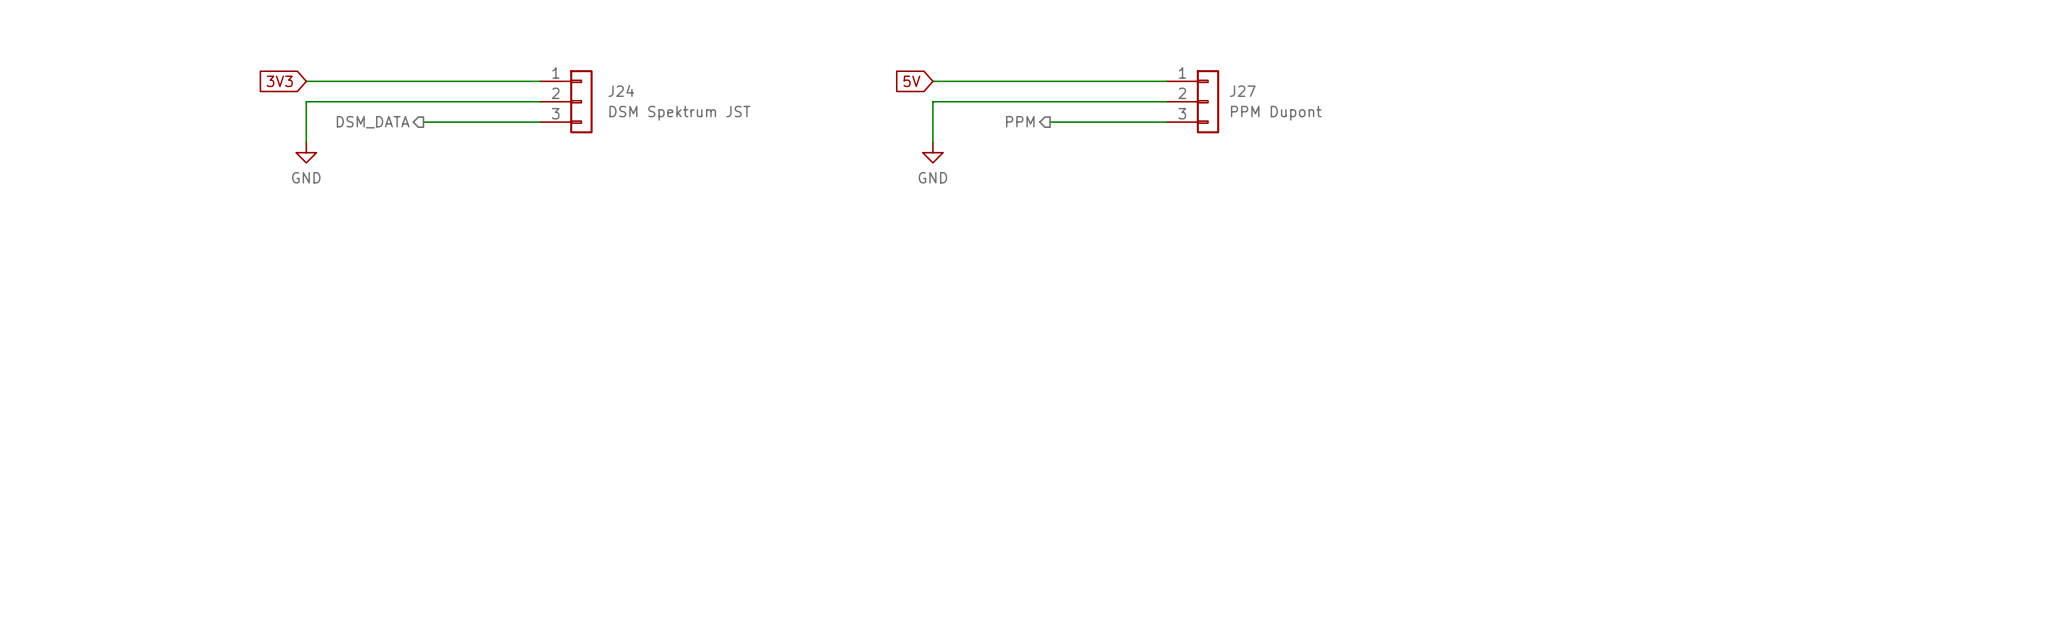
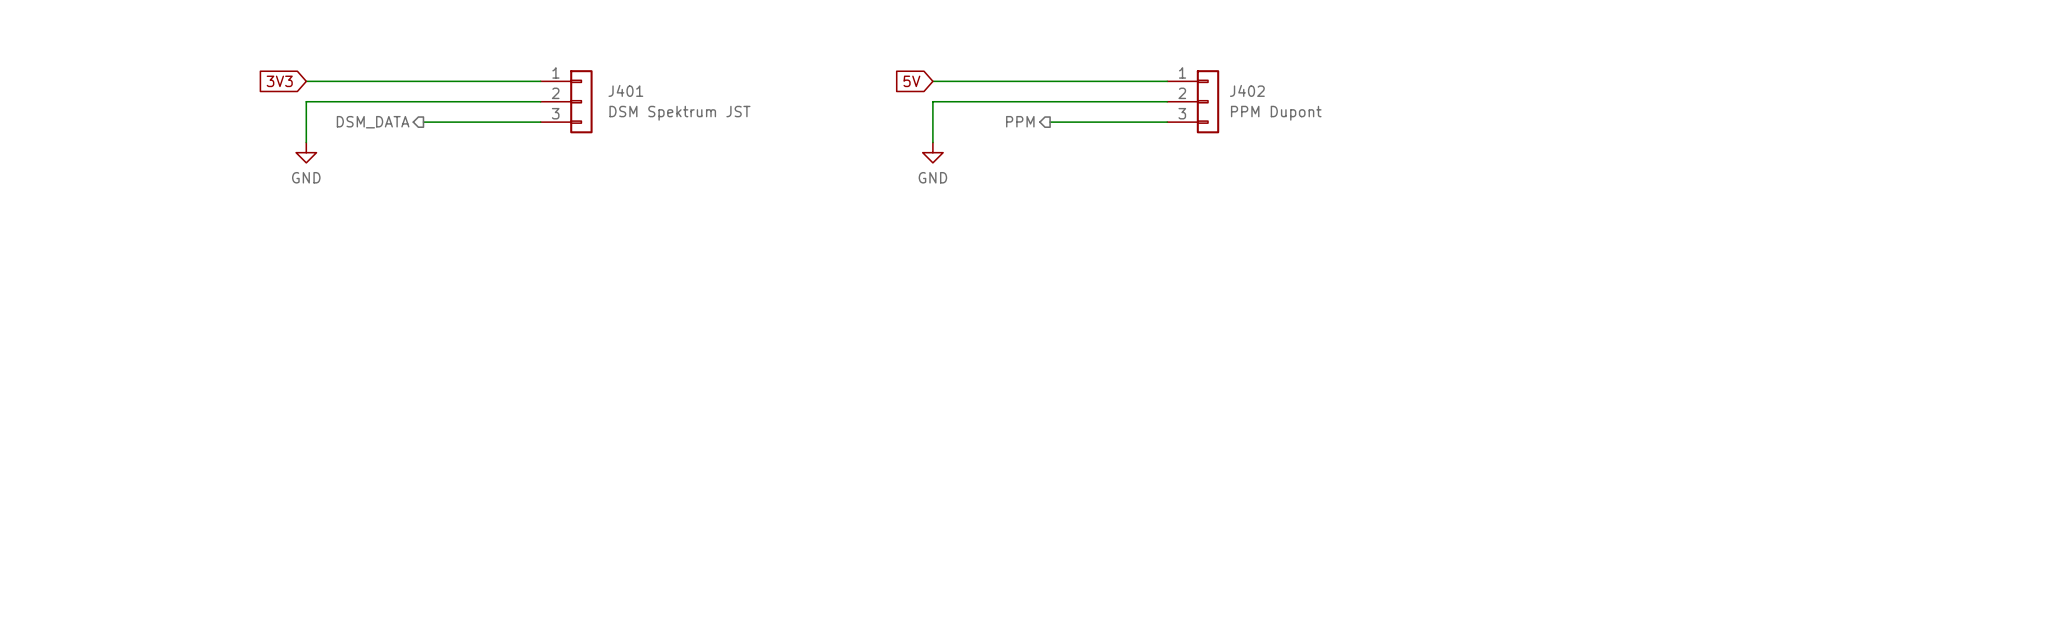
J24 name: J24 (621, 90) -> J401 (625, 90)
J27 name: J27 (1242, 91) -> J402 (1247, 90)

